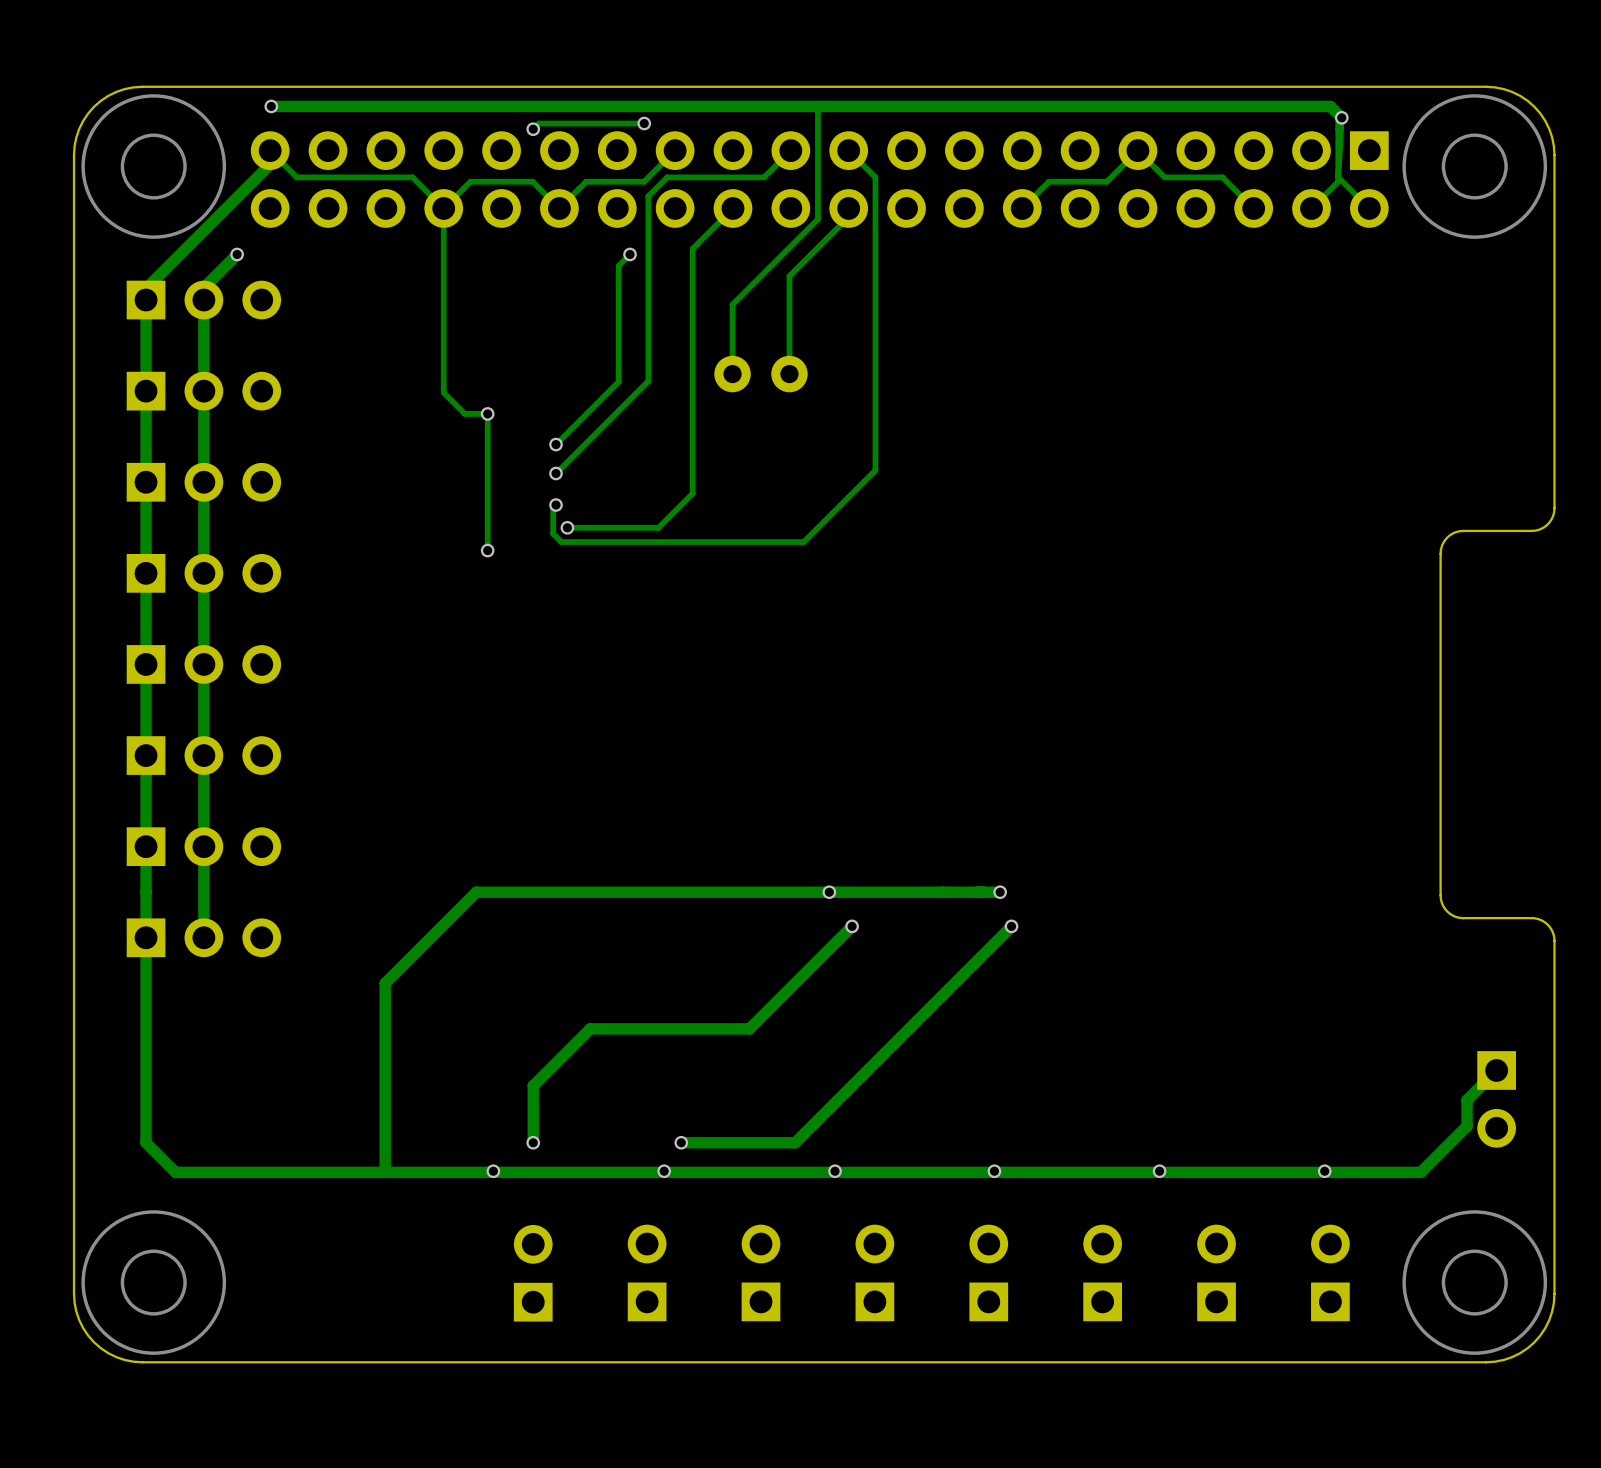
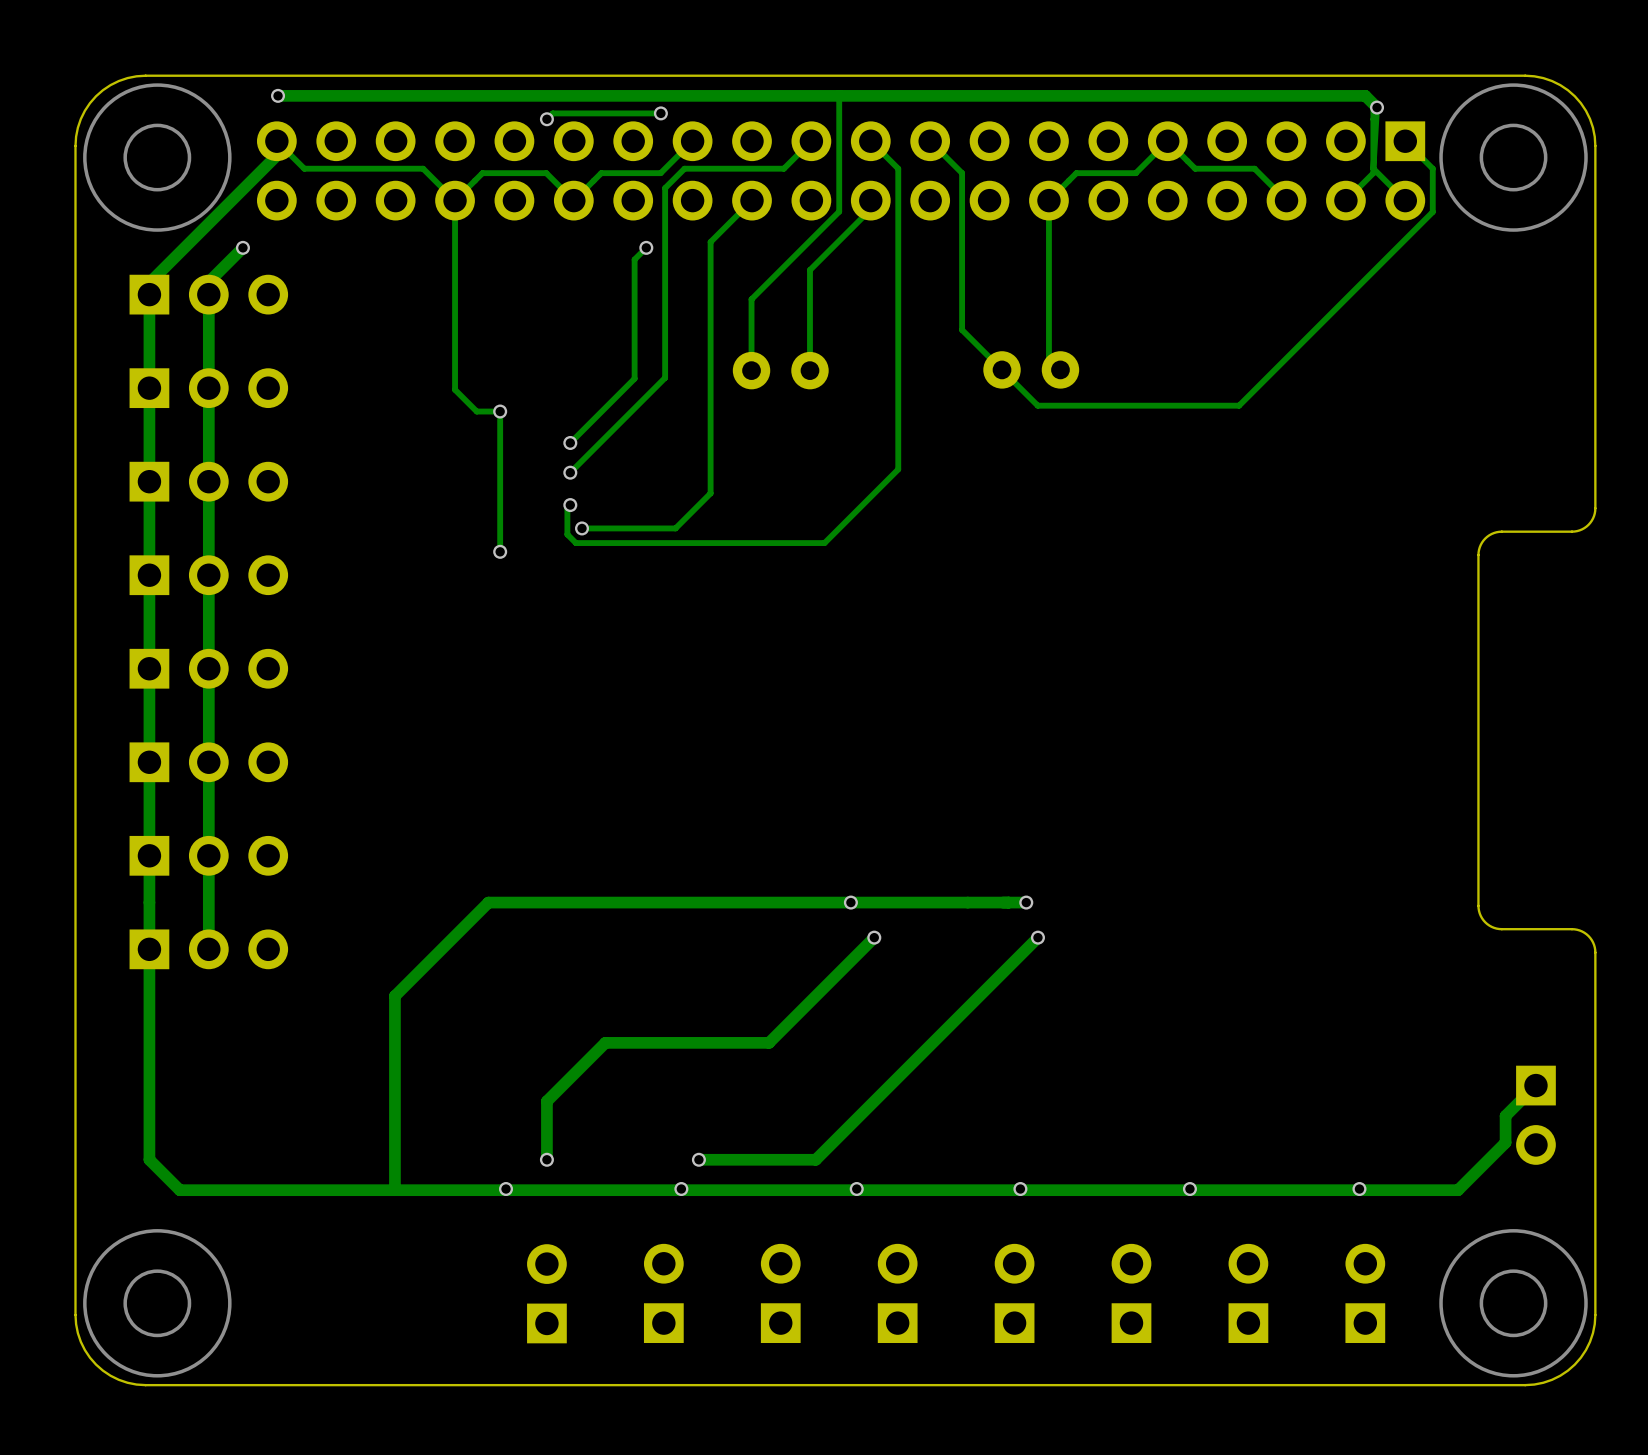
track: none -> (1405, 141) (1432, 168) (1432, 212) (1239, 405) (1037, 405) (962, 329) (962, 173) (930, 141)
track: none -> (1048, 200) (1048, 358) (1060, 369)
part: none -> (1031, 369)

